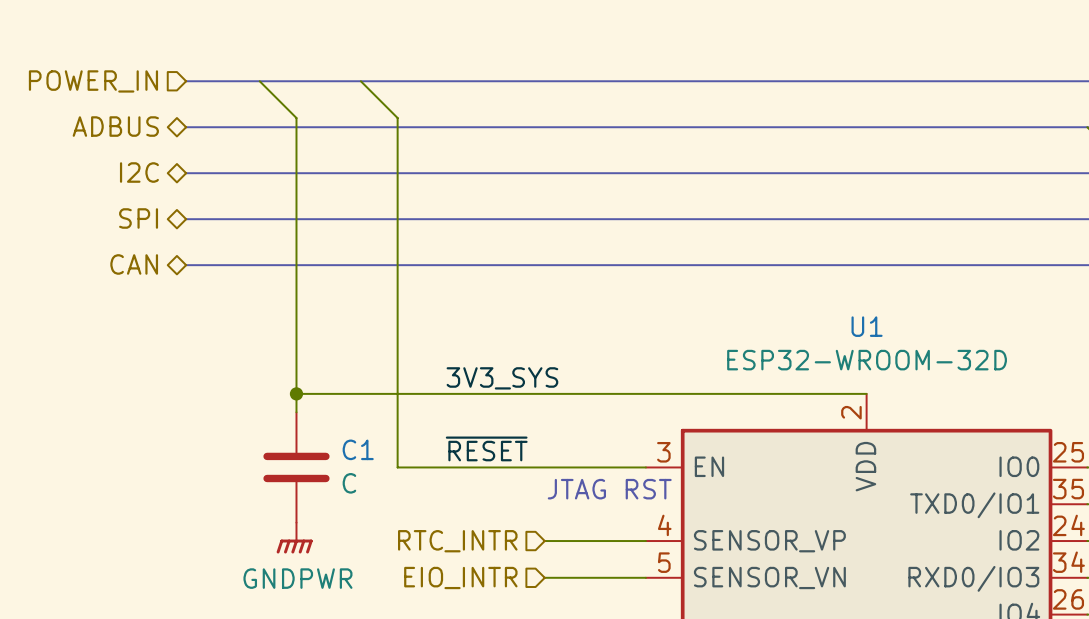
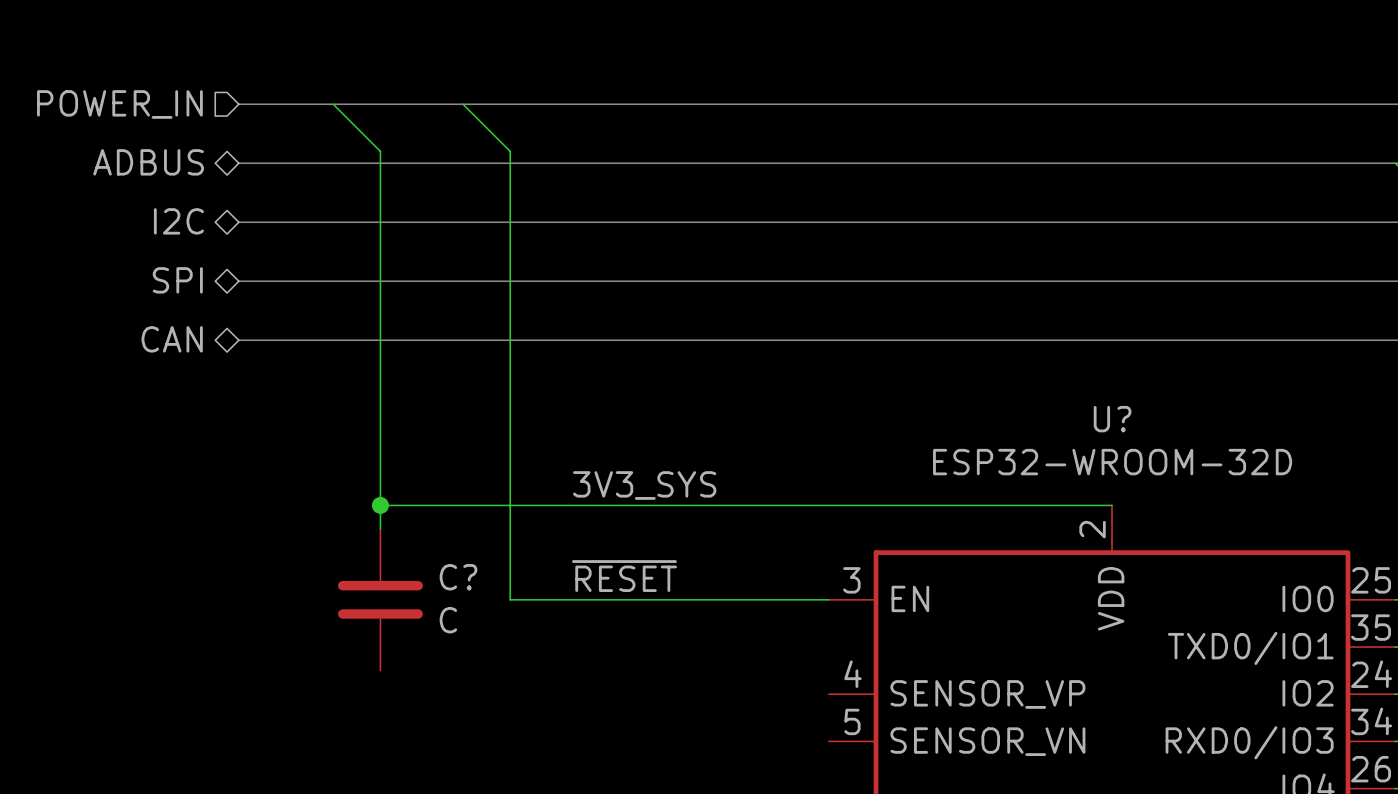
U1 name: U1 (867, 326) -> U? (1112, 419)
C1 name: C1 (358, 449) -> C? (458, 577)
text: JTAG RST (609, 489) -> none
power symbol: GNDPWR (294, 538) -> none
hierarchical label: RTC_INTR (457, 541) -> none
wire: (544, 541) (645, 541) -> none
hierarchical label: EIO_INTR (460, 577) -> none
wire: (544, 577) (645, 577) -> none

